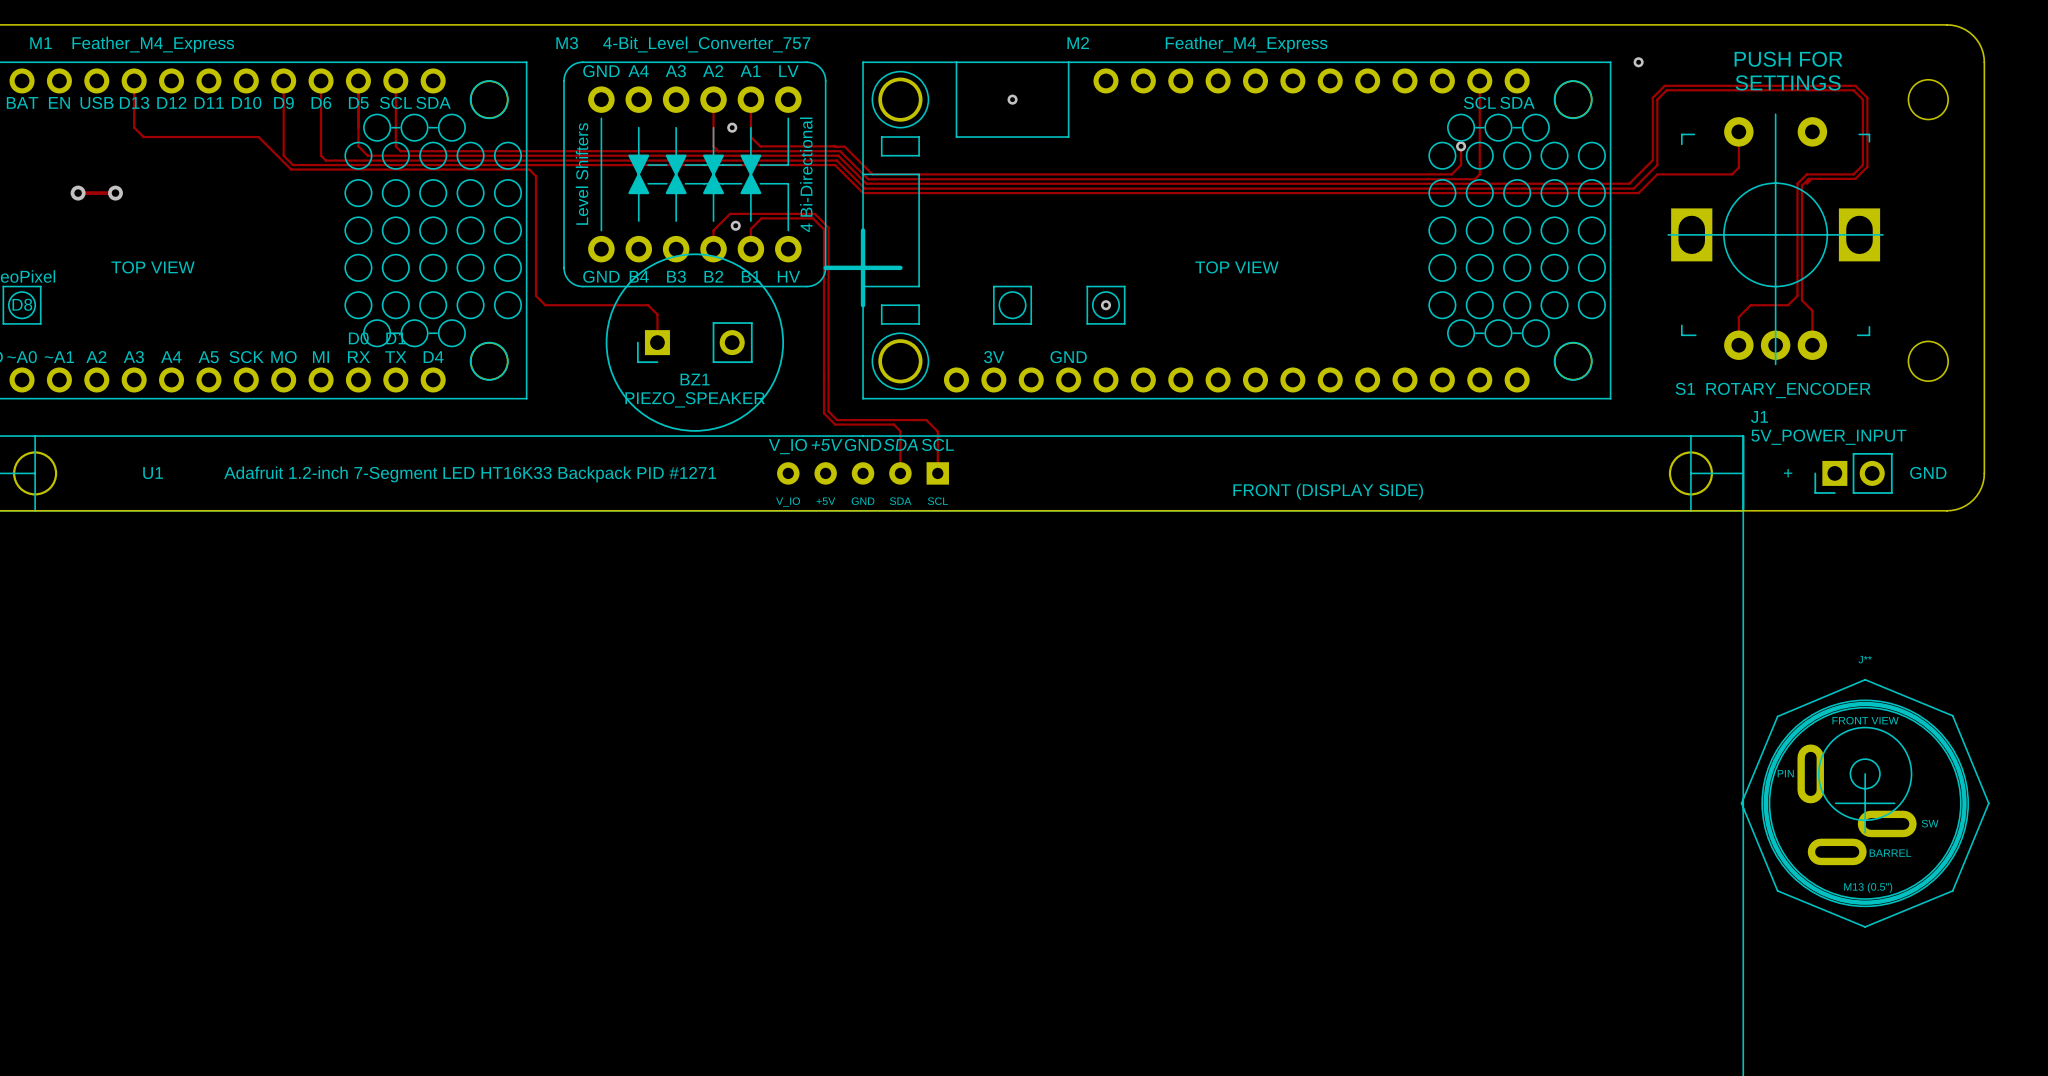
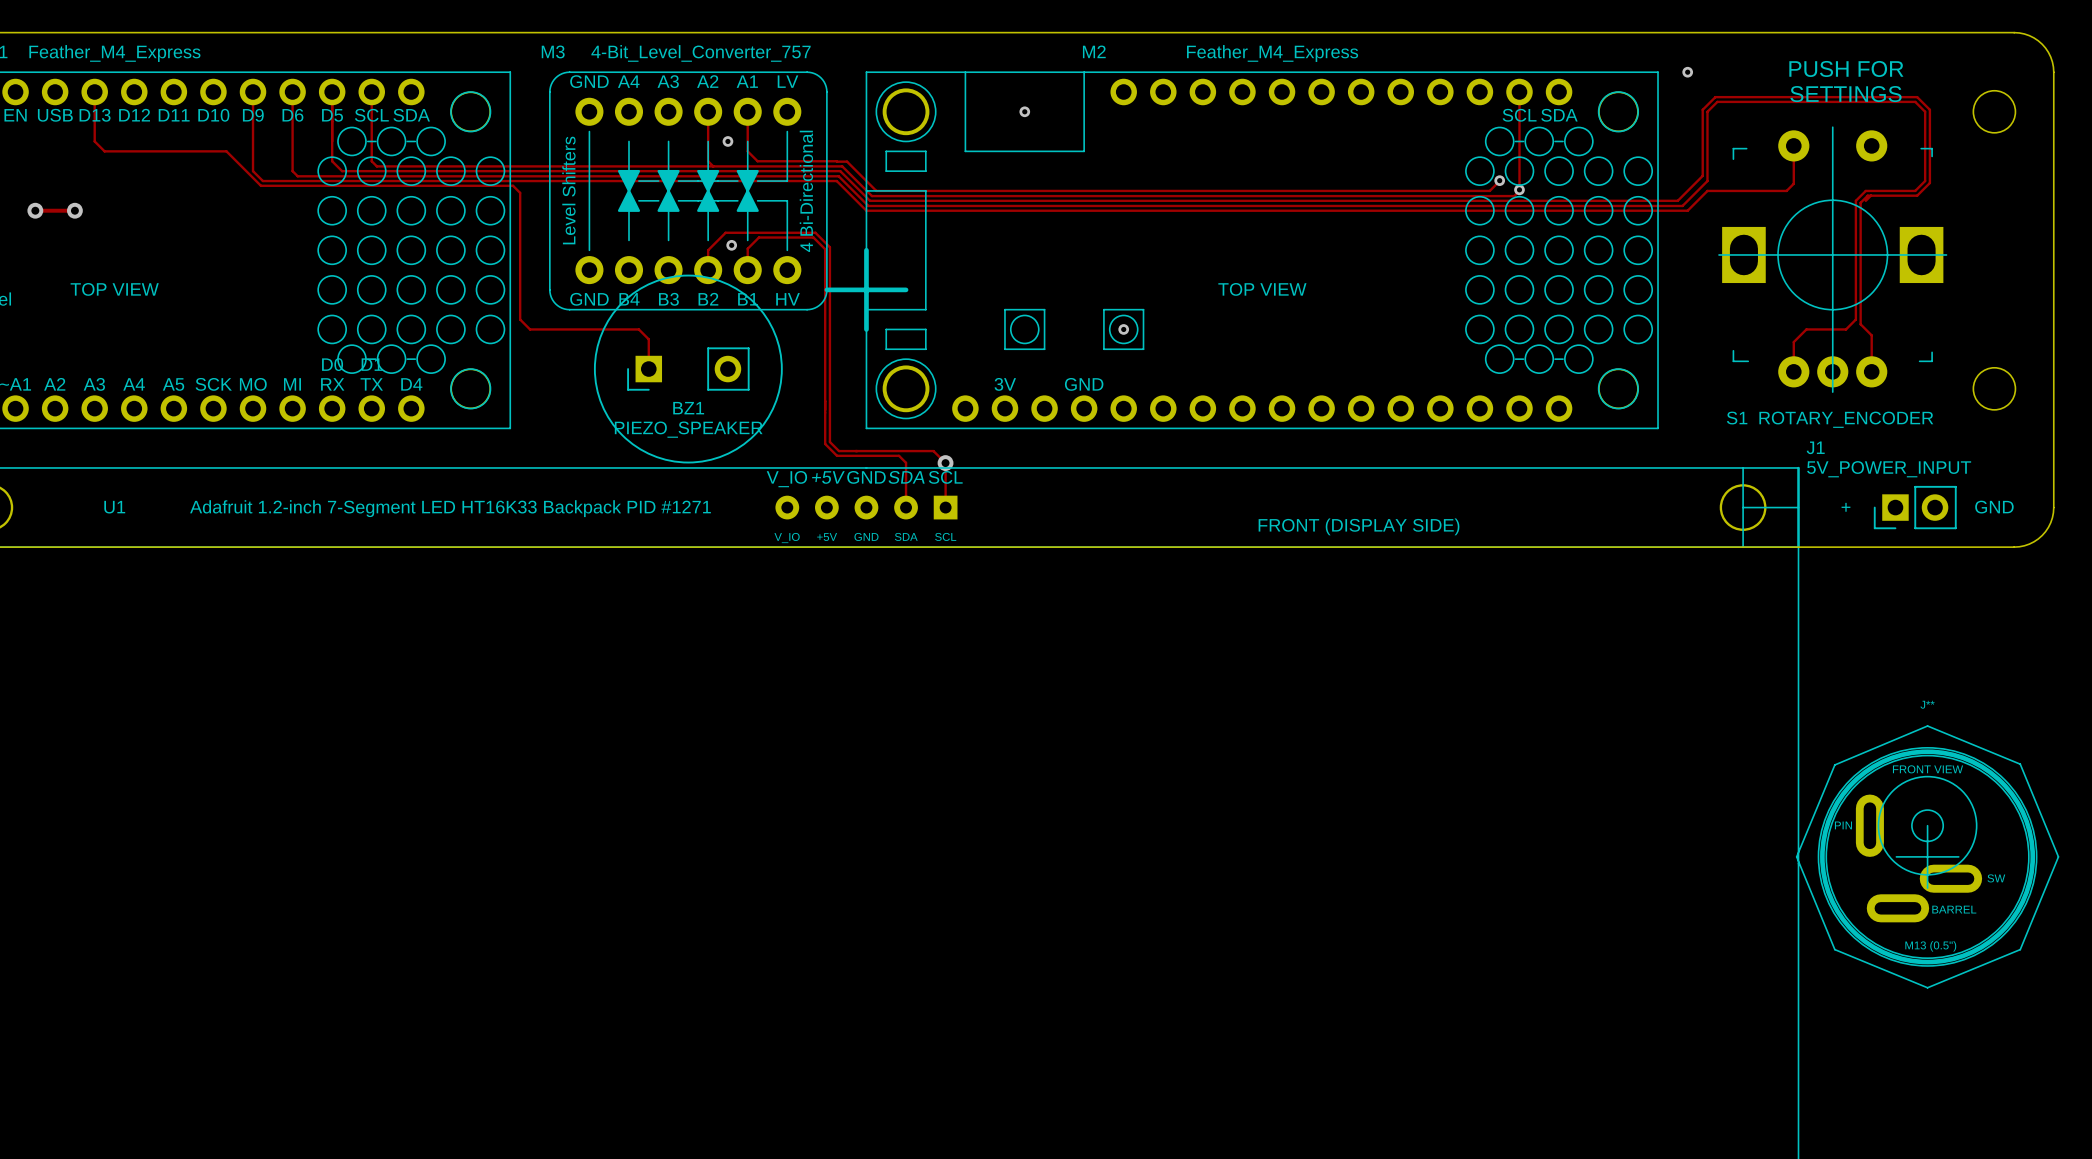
track: (1461, 146) (1461, 165) -> none
via: (1461, 146) -> none
via: none -> (1499, 180)
via: none -> (1519, 189)
via: none -> (945, 463)

